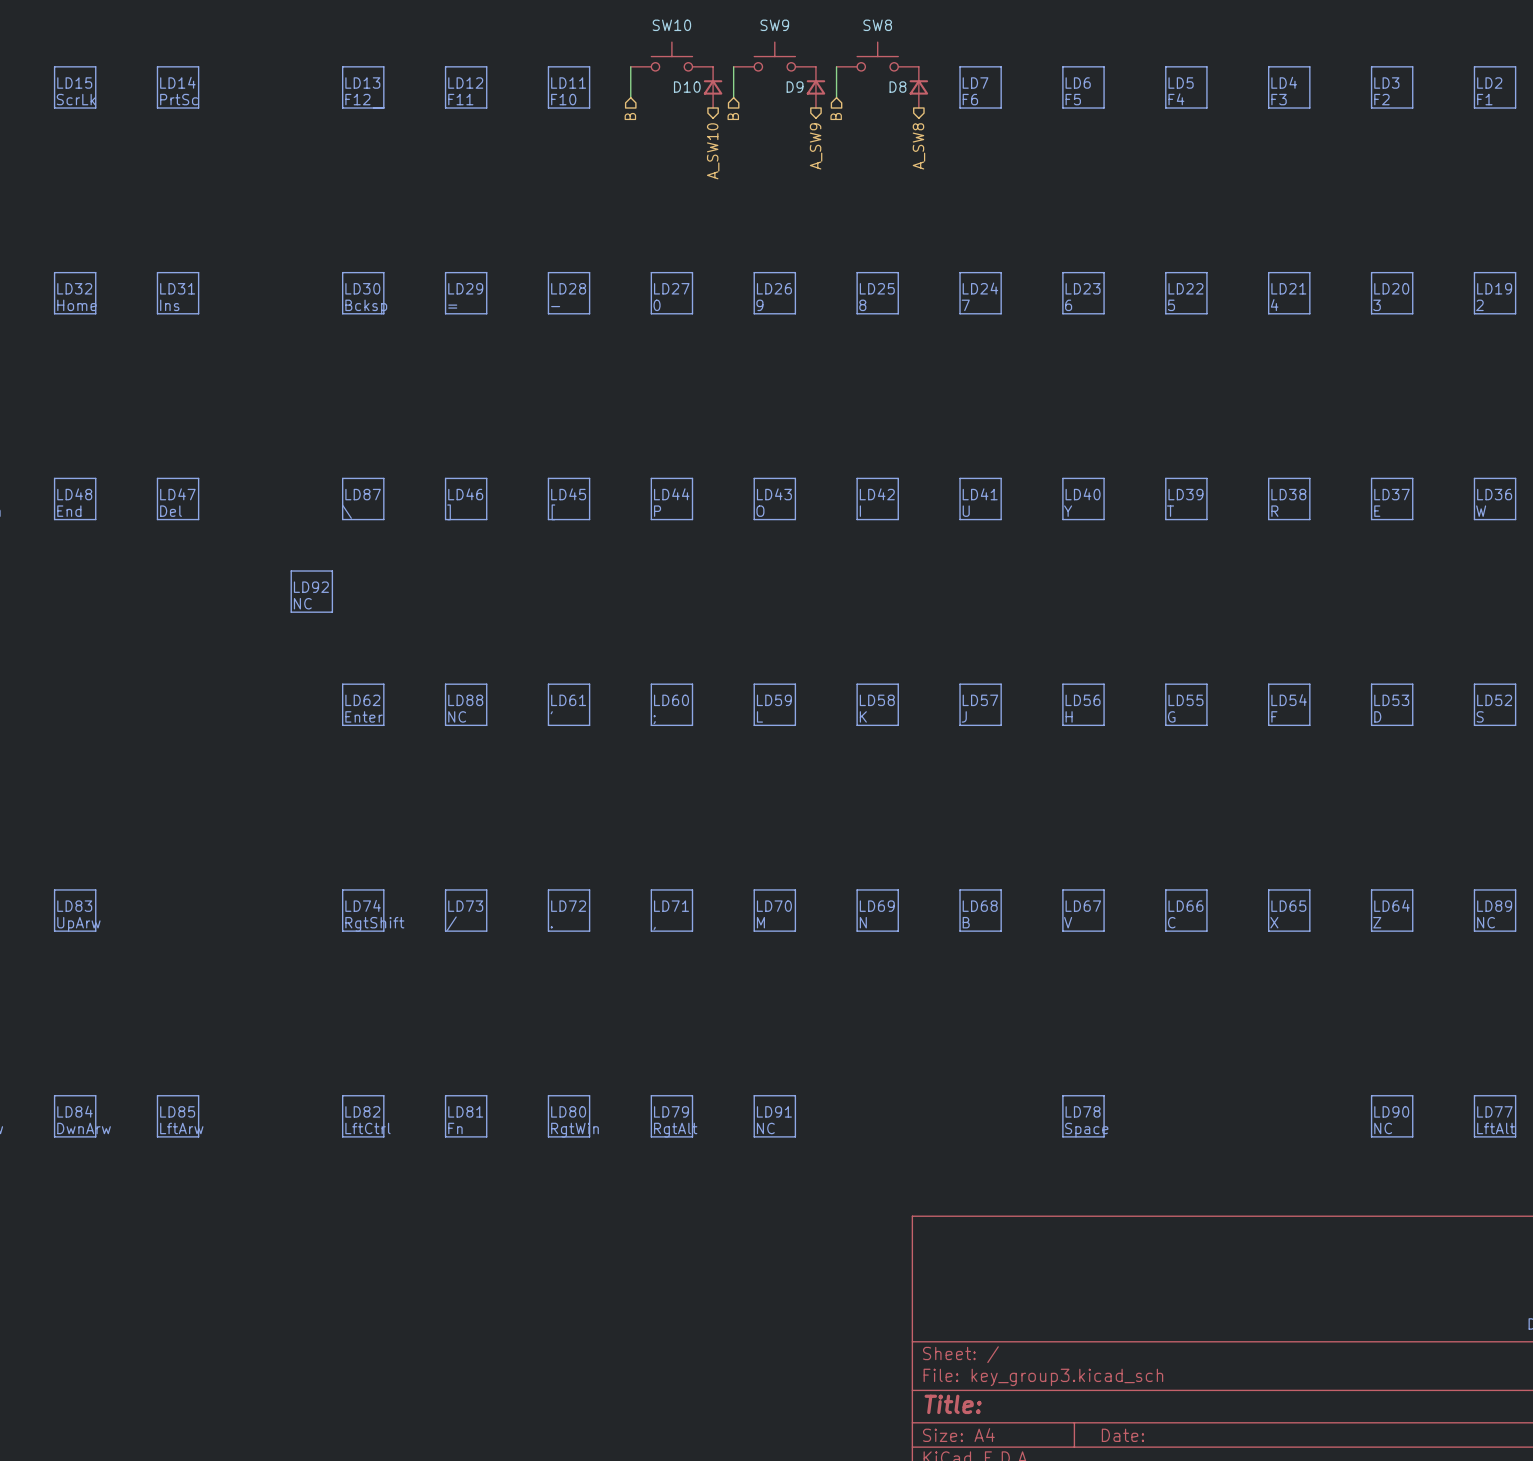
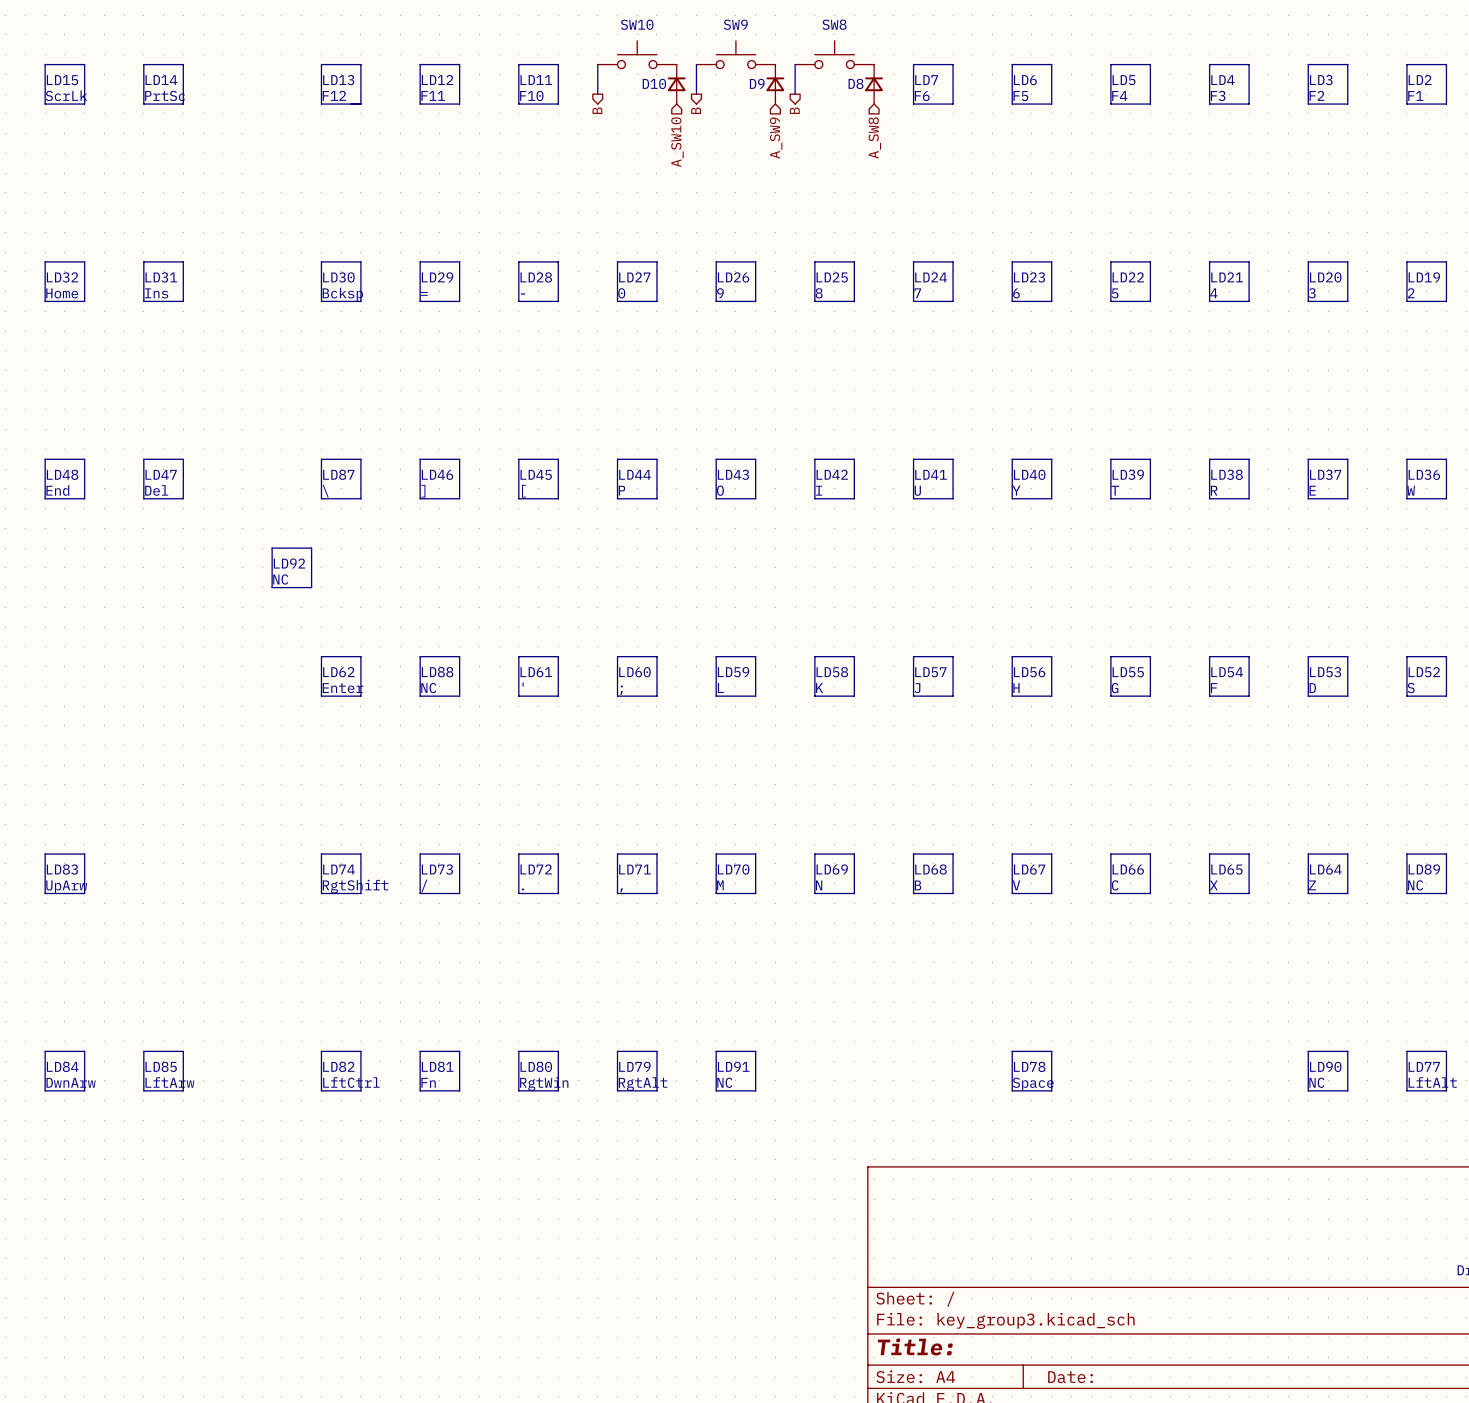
hierarchical label shape: input (630, 116) -> output (597, 110)
hierarchical label shape: input (733, 116) -> output (696, 110)
hierarchical label shape: input (836, 116) -> output (794, 110)
hierarchical label shape: output (816, 146) -> input (776, 138)
hierarchical label shape: output (918, 146) -> input (874, 137)
hierarchical label shape: output (713, 151) -> input (677, 142)

